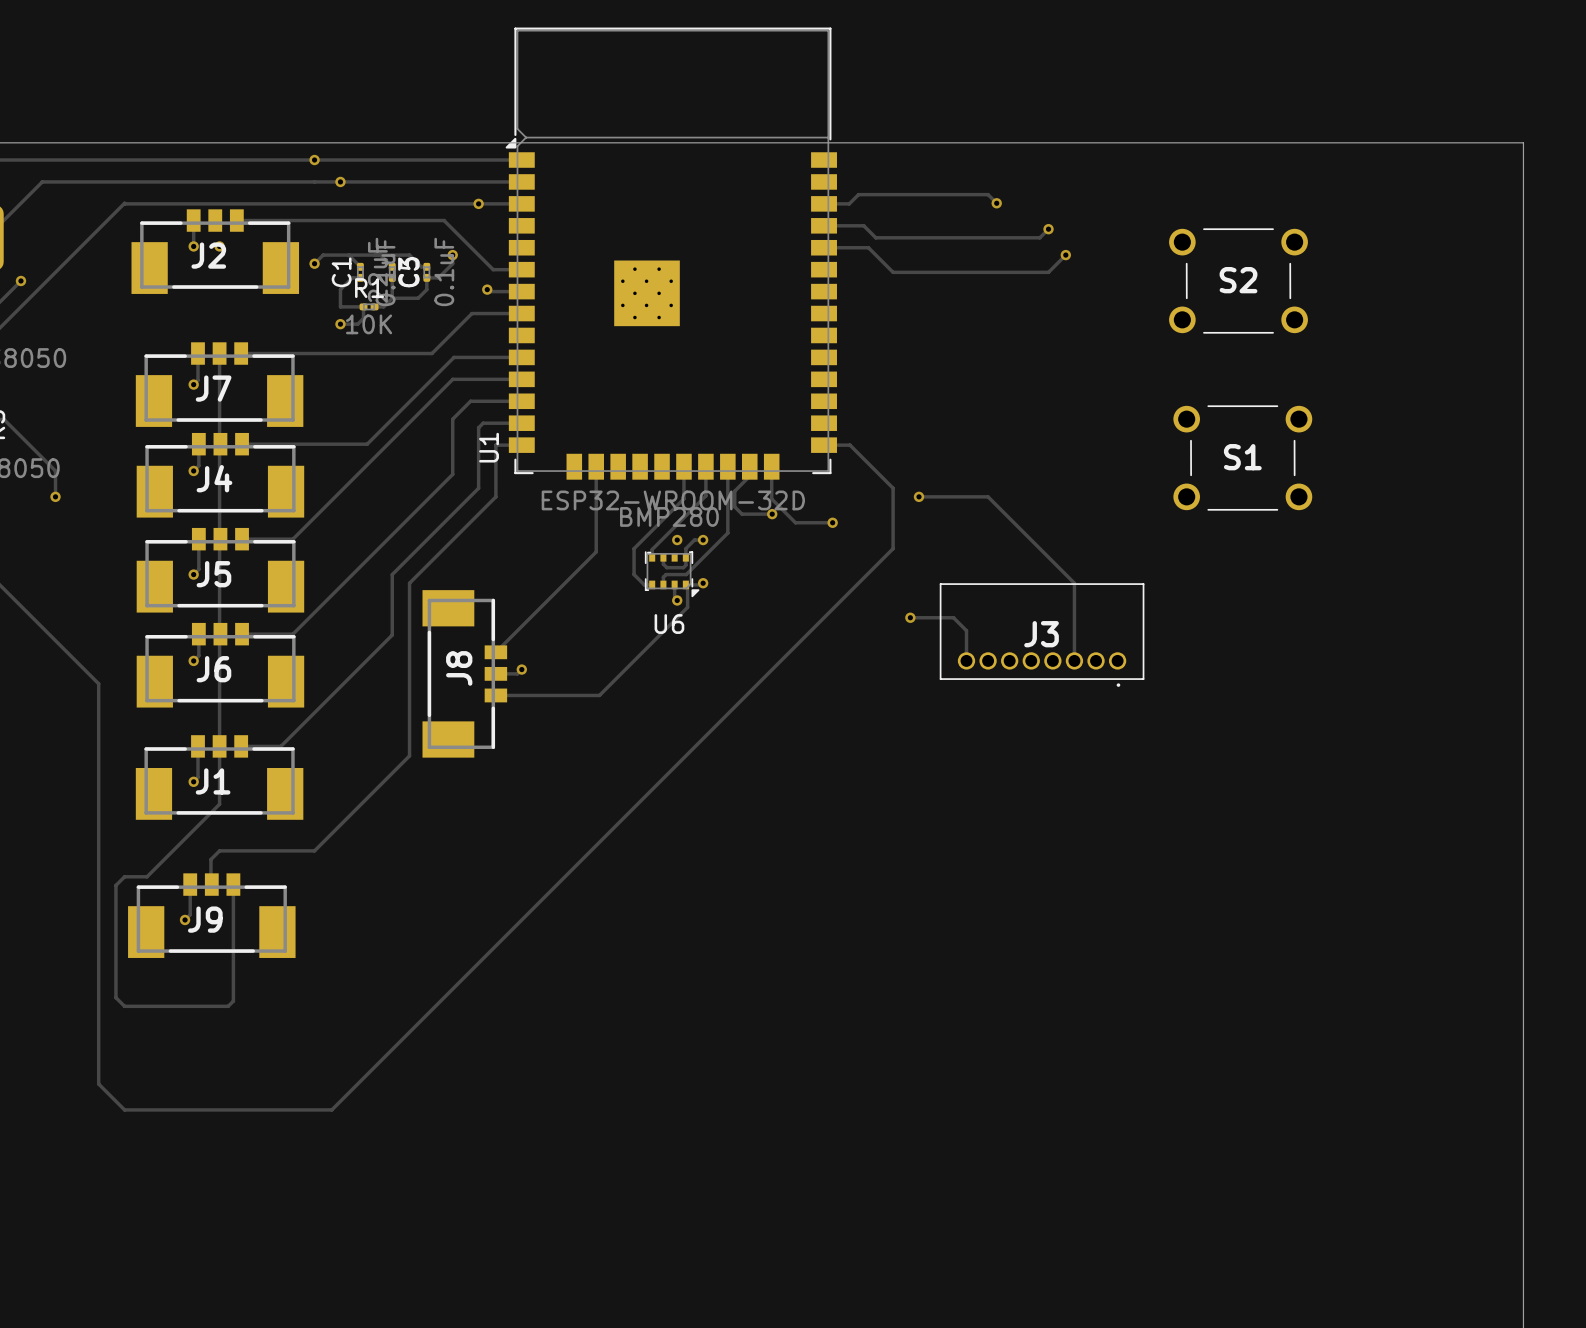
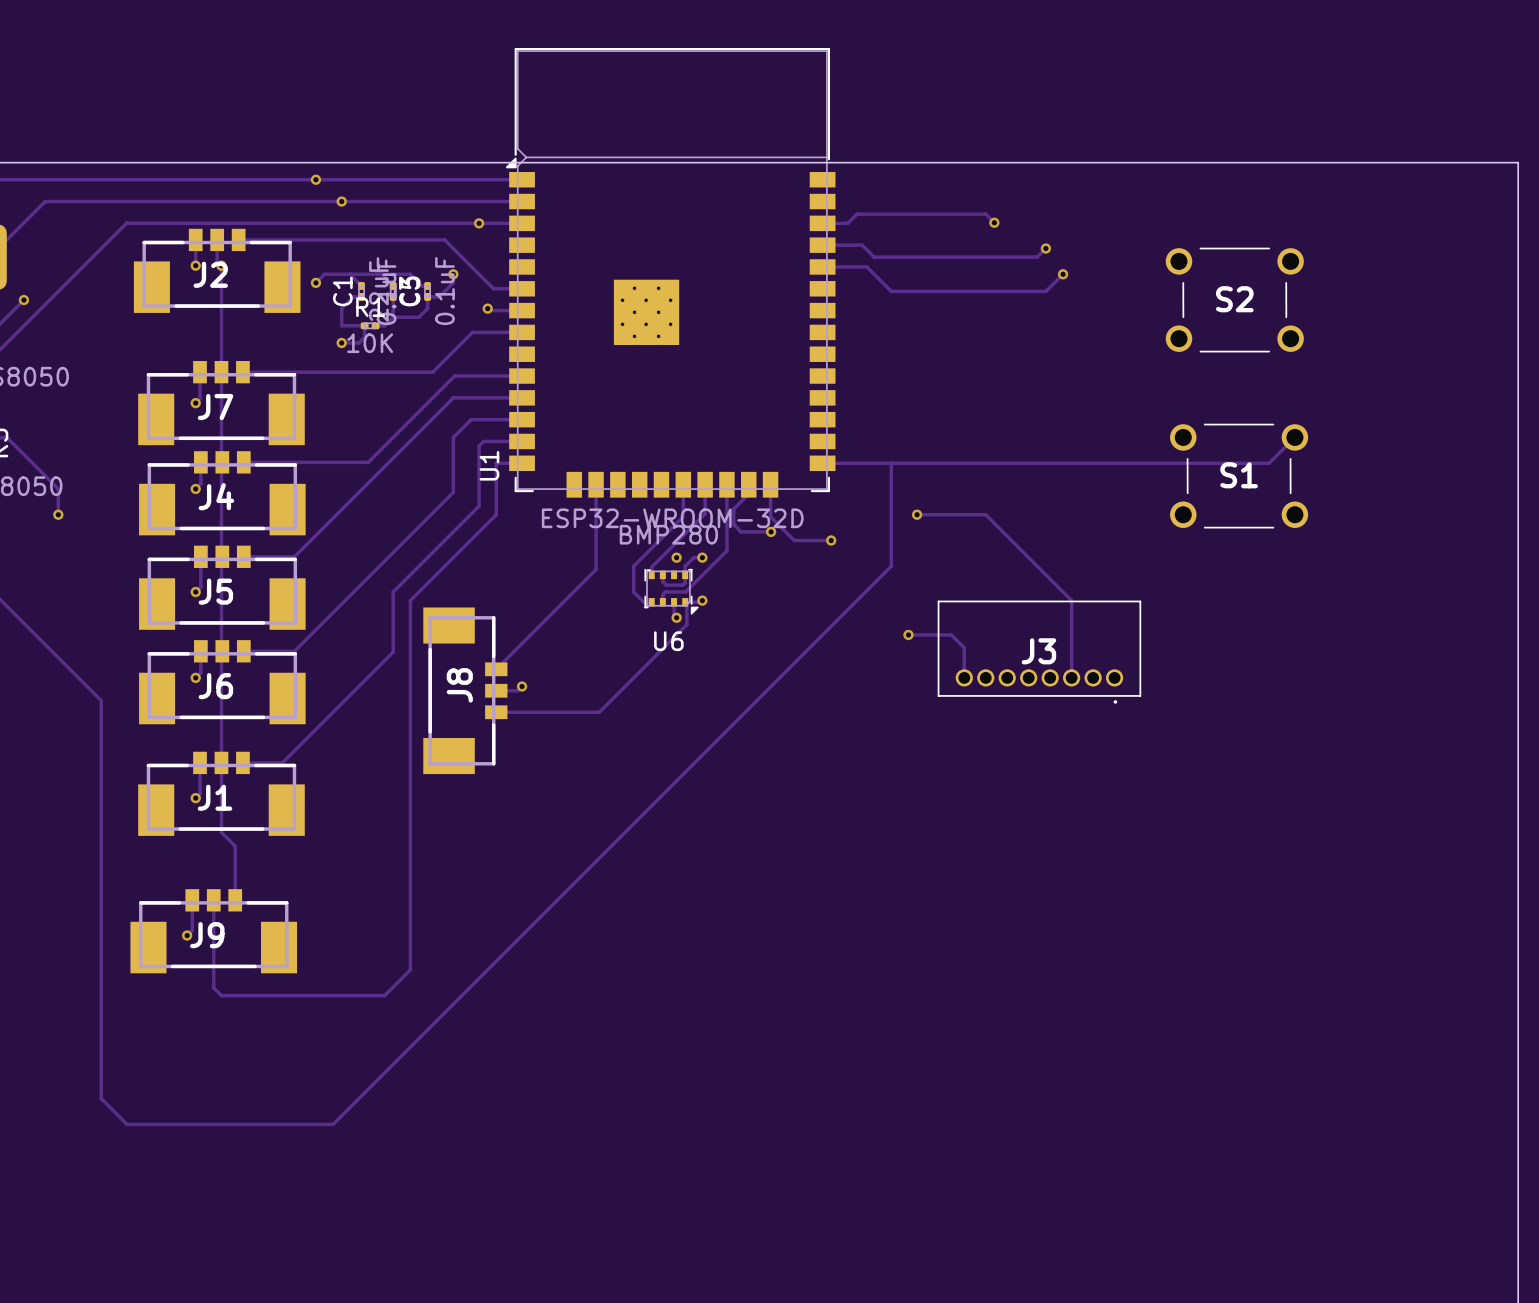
track: none -> (217, 239) (217, 261) (221, 265) (221, 372)
track: none -> (1294, 437) (1269, 463) (848, 463)
track: (850, 445) (893, 488) -> (891, 463) (891, 506)
track: (409, 755) (314, 850) (219, 850) (210, 859) (210, 879) -> (410, 772) (410, 969) (384, 995) (221, 995) (213, 987) (213, 900)
track: (219, 804) (147, 876) (124, 876) (115, 885) (115, 997) (124, 1006) (228, 1006) (233, 1001) (233, 884) -> (221, 820) (221, 832) (235, 846) (235, 900)

